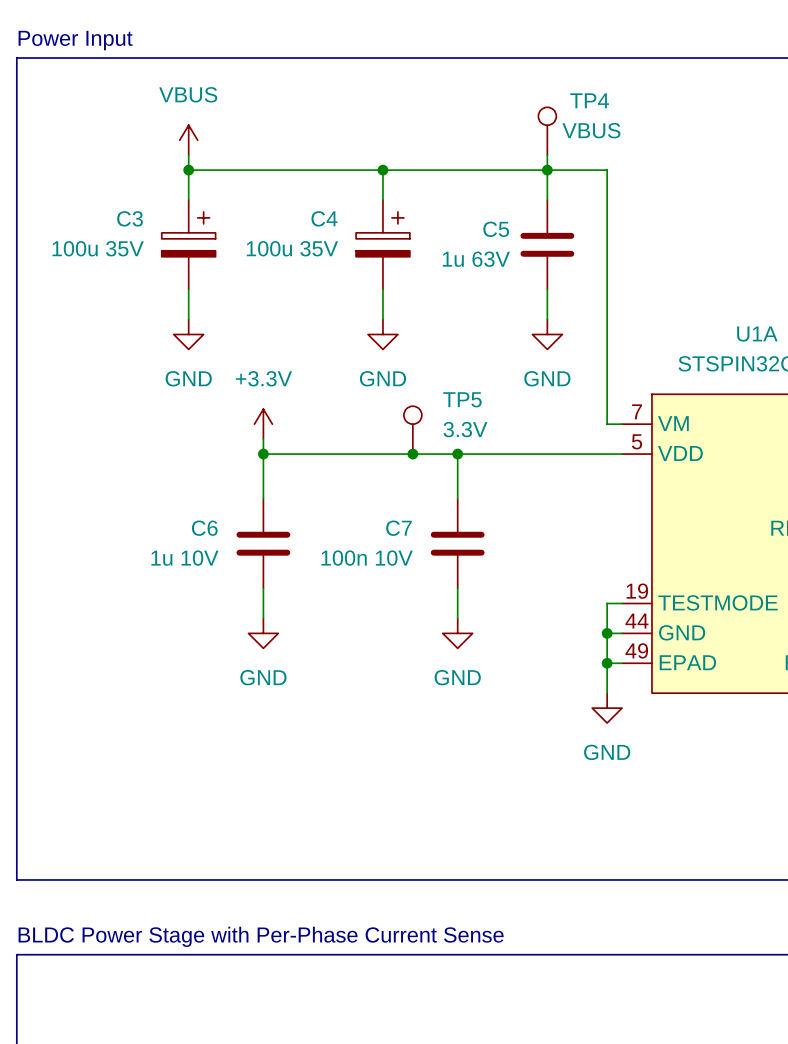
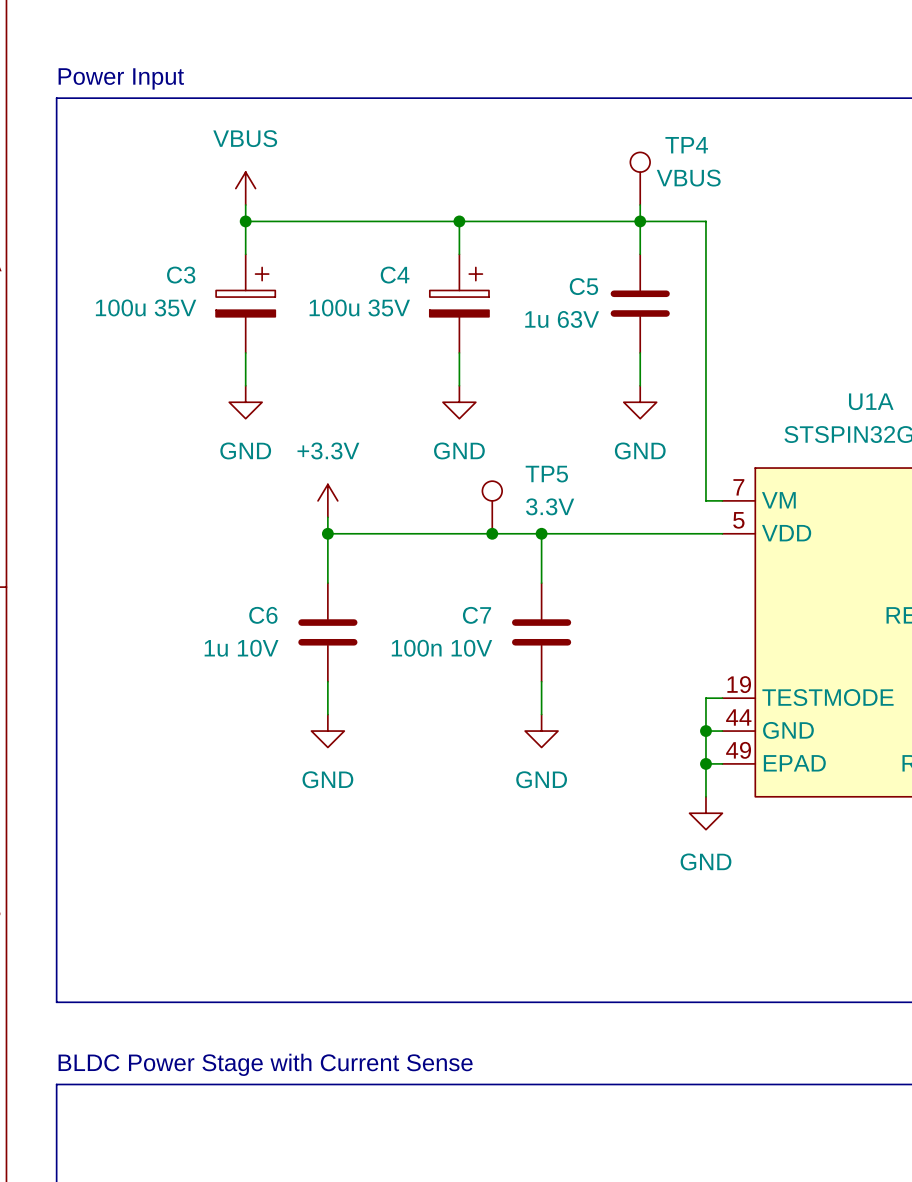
text: BLDC Power Stage with Per-Phase Current Sense (261, 936) -> BLDC Power Stage with Current Sense (265, 1064)

